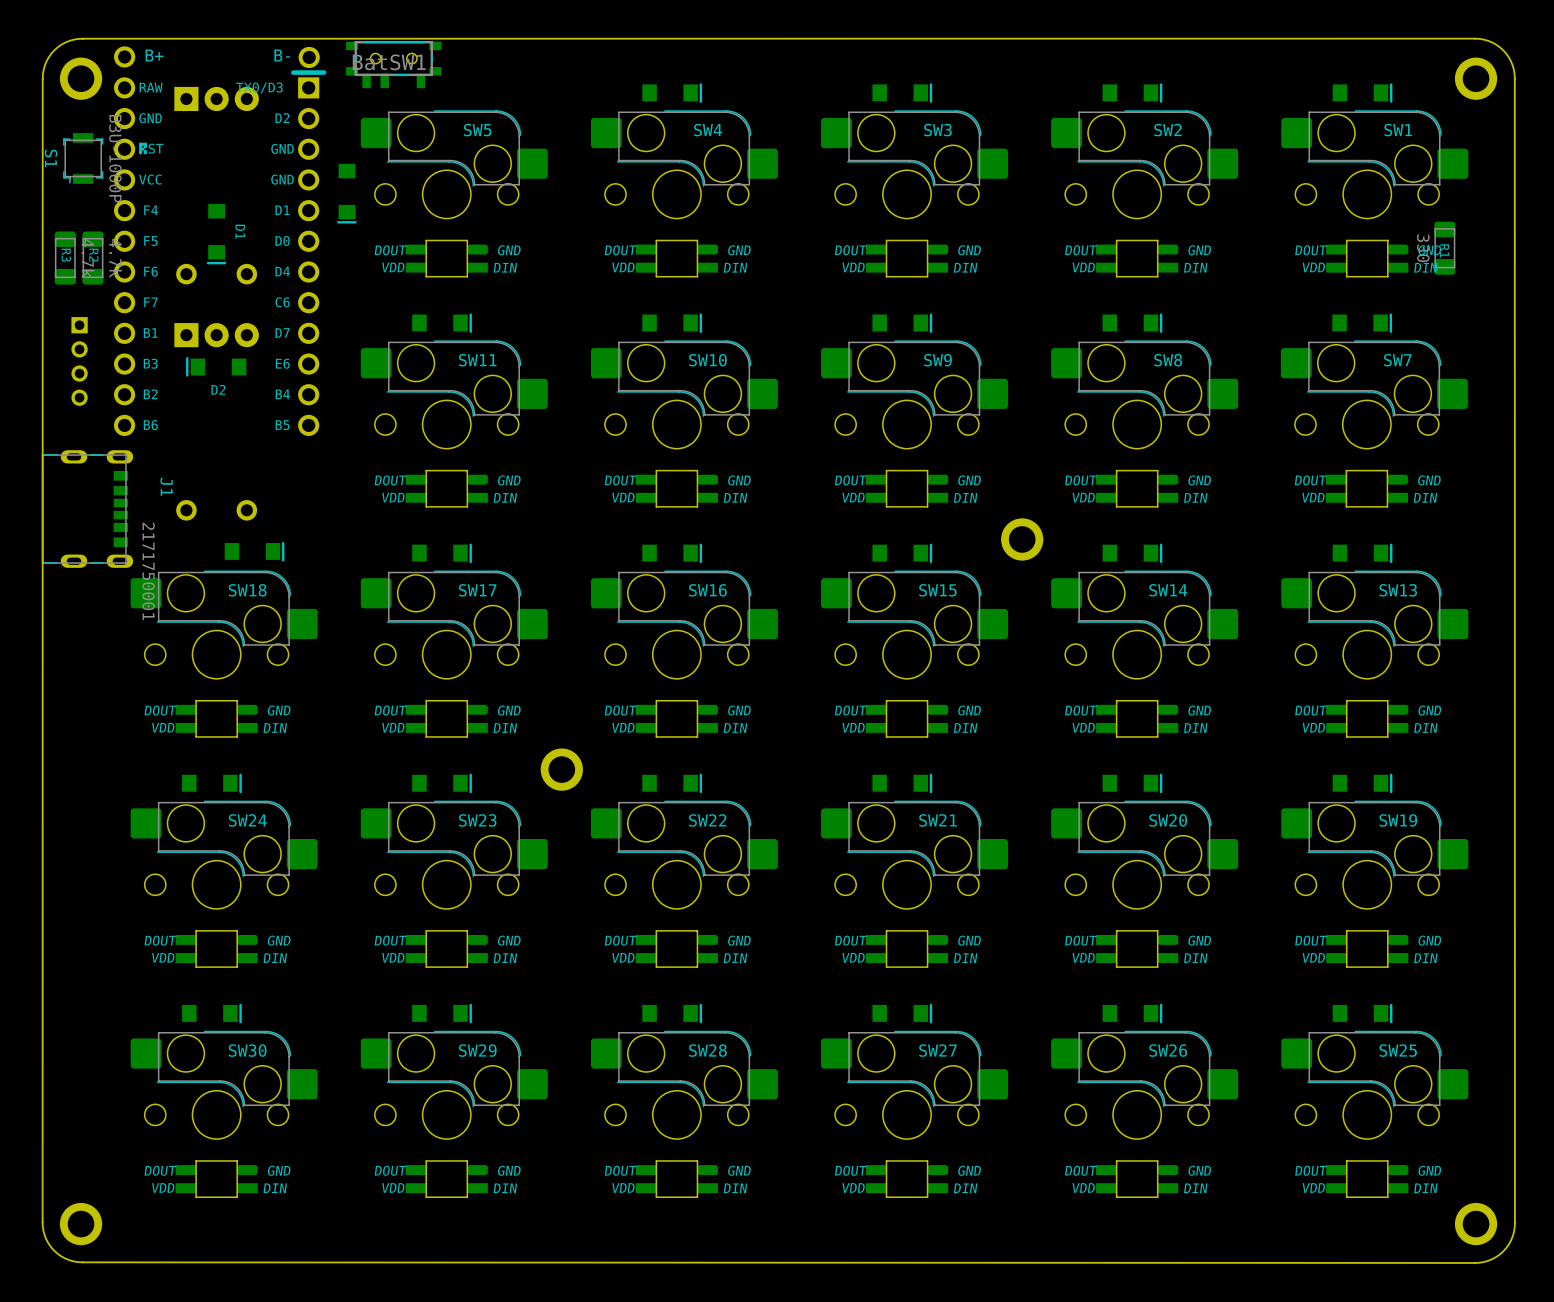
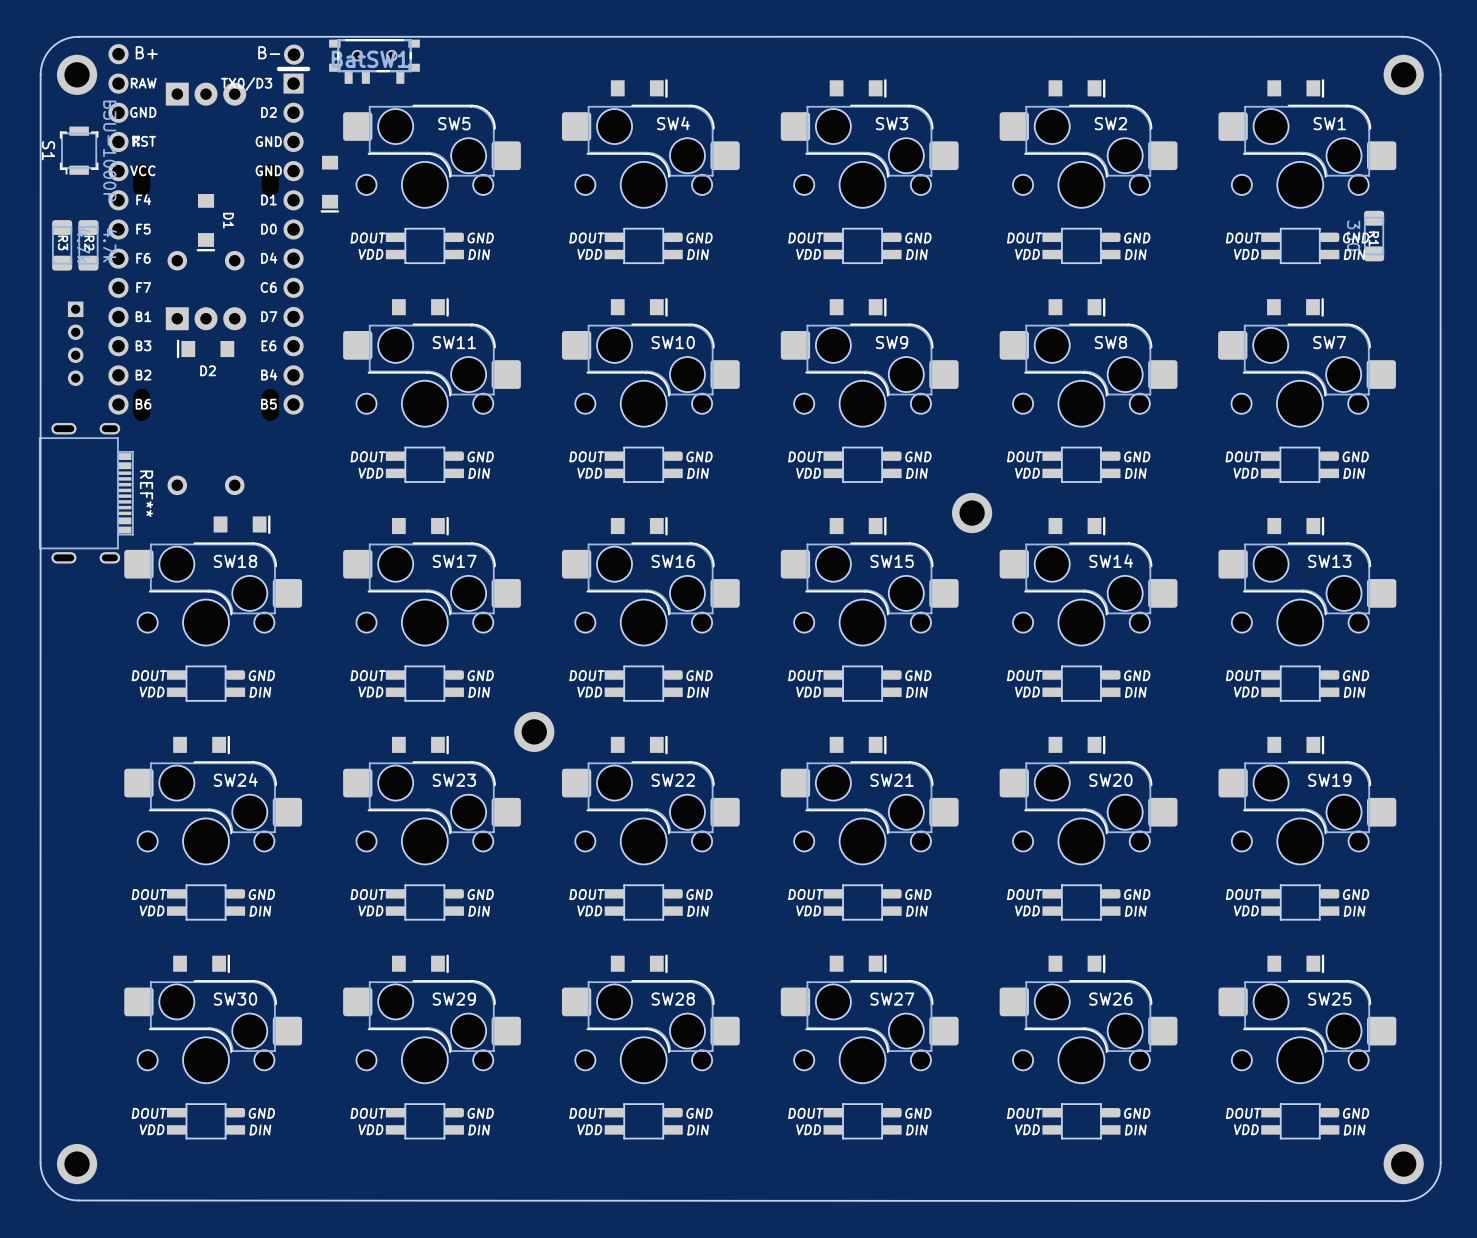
J1: 2171750001 (87, 509) -> none
REF**: none -> (86, 493)

